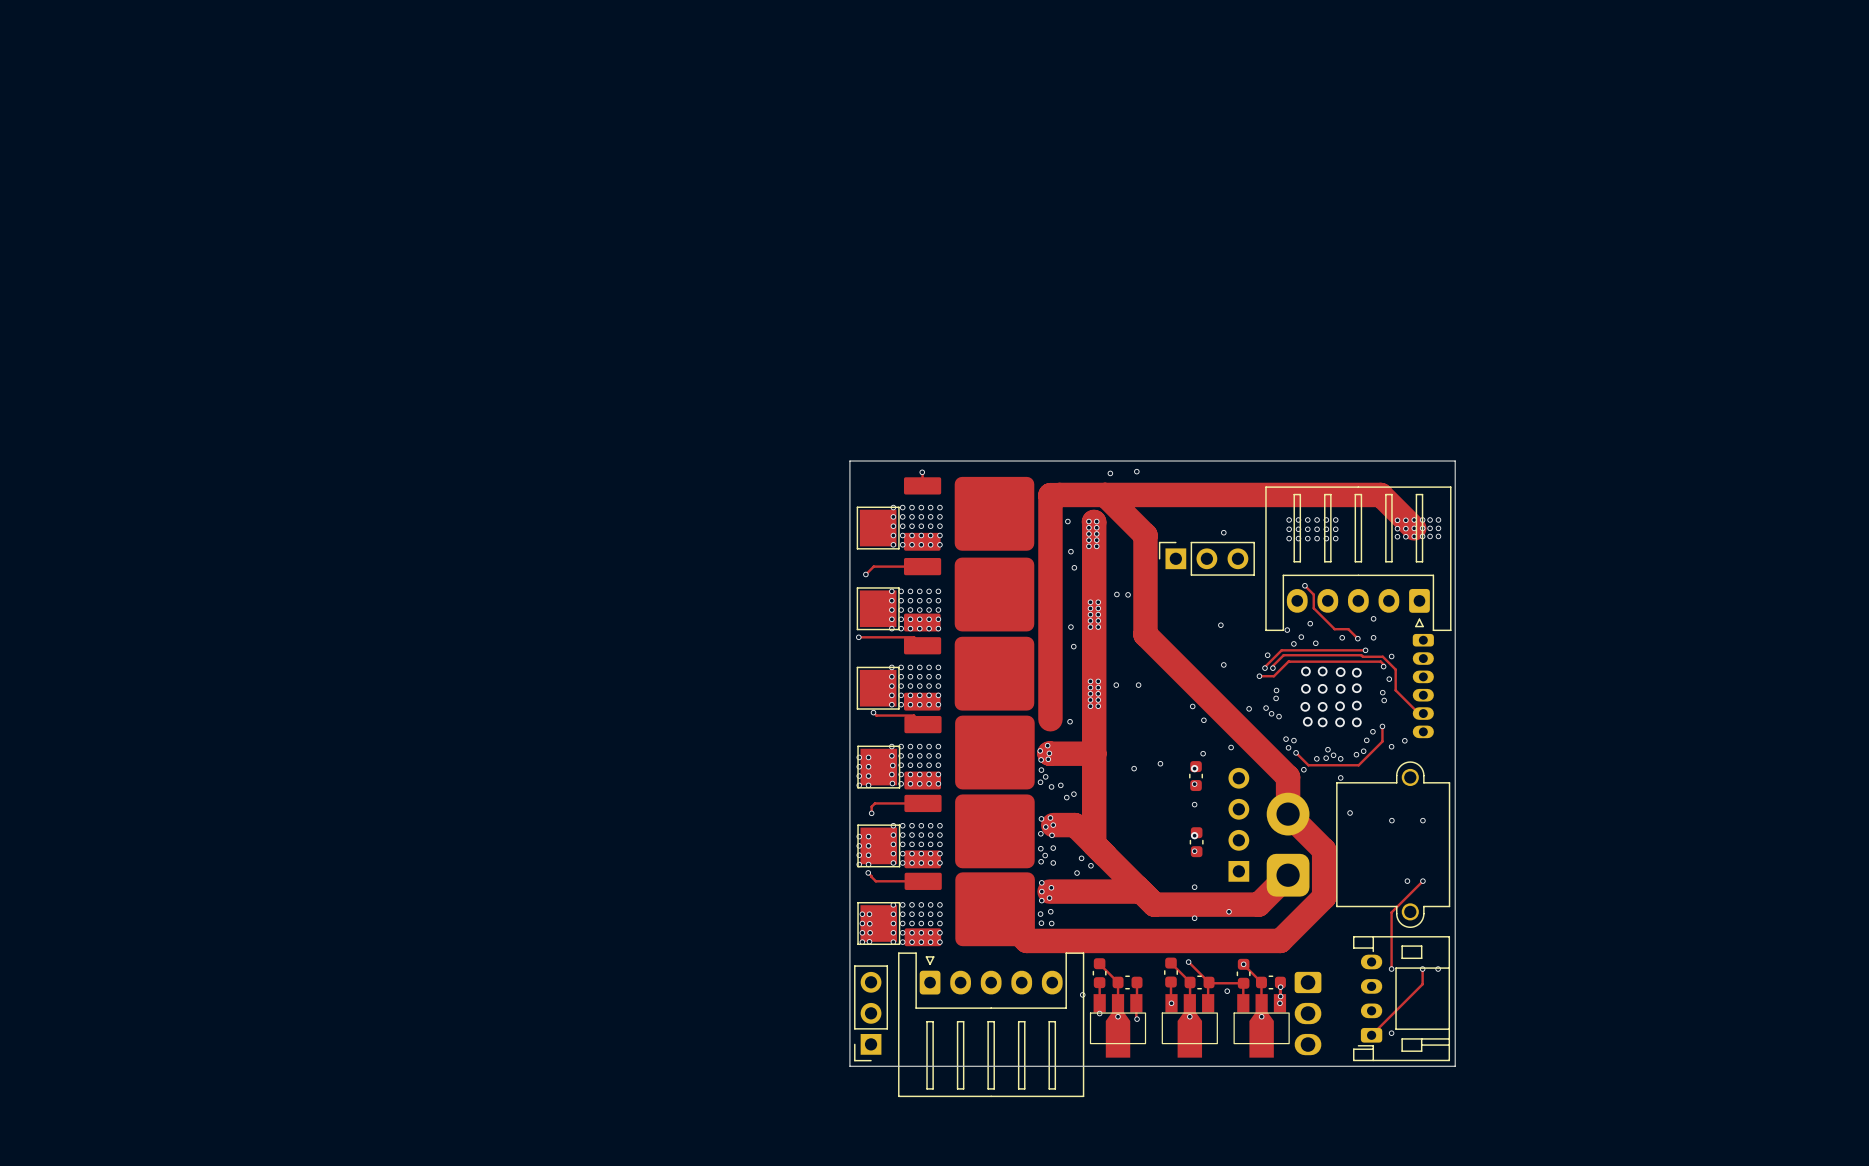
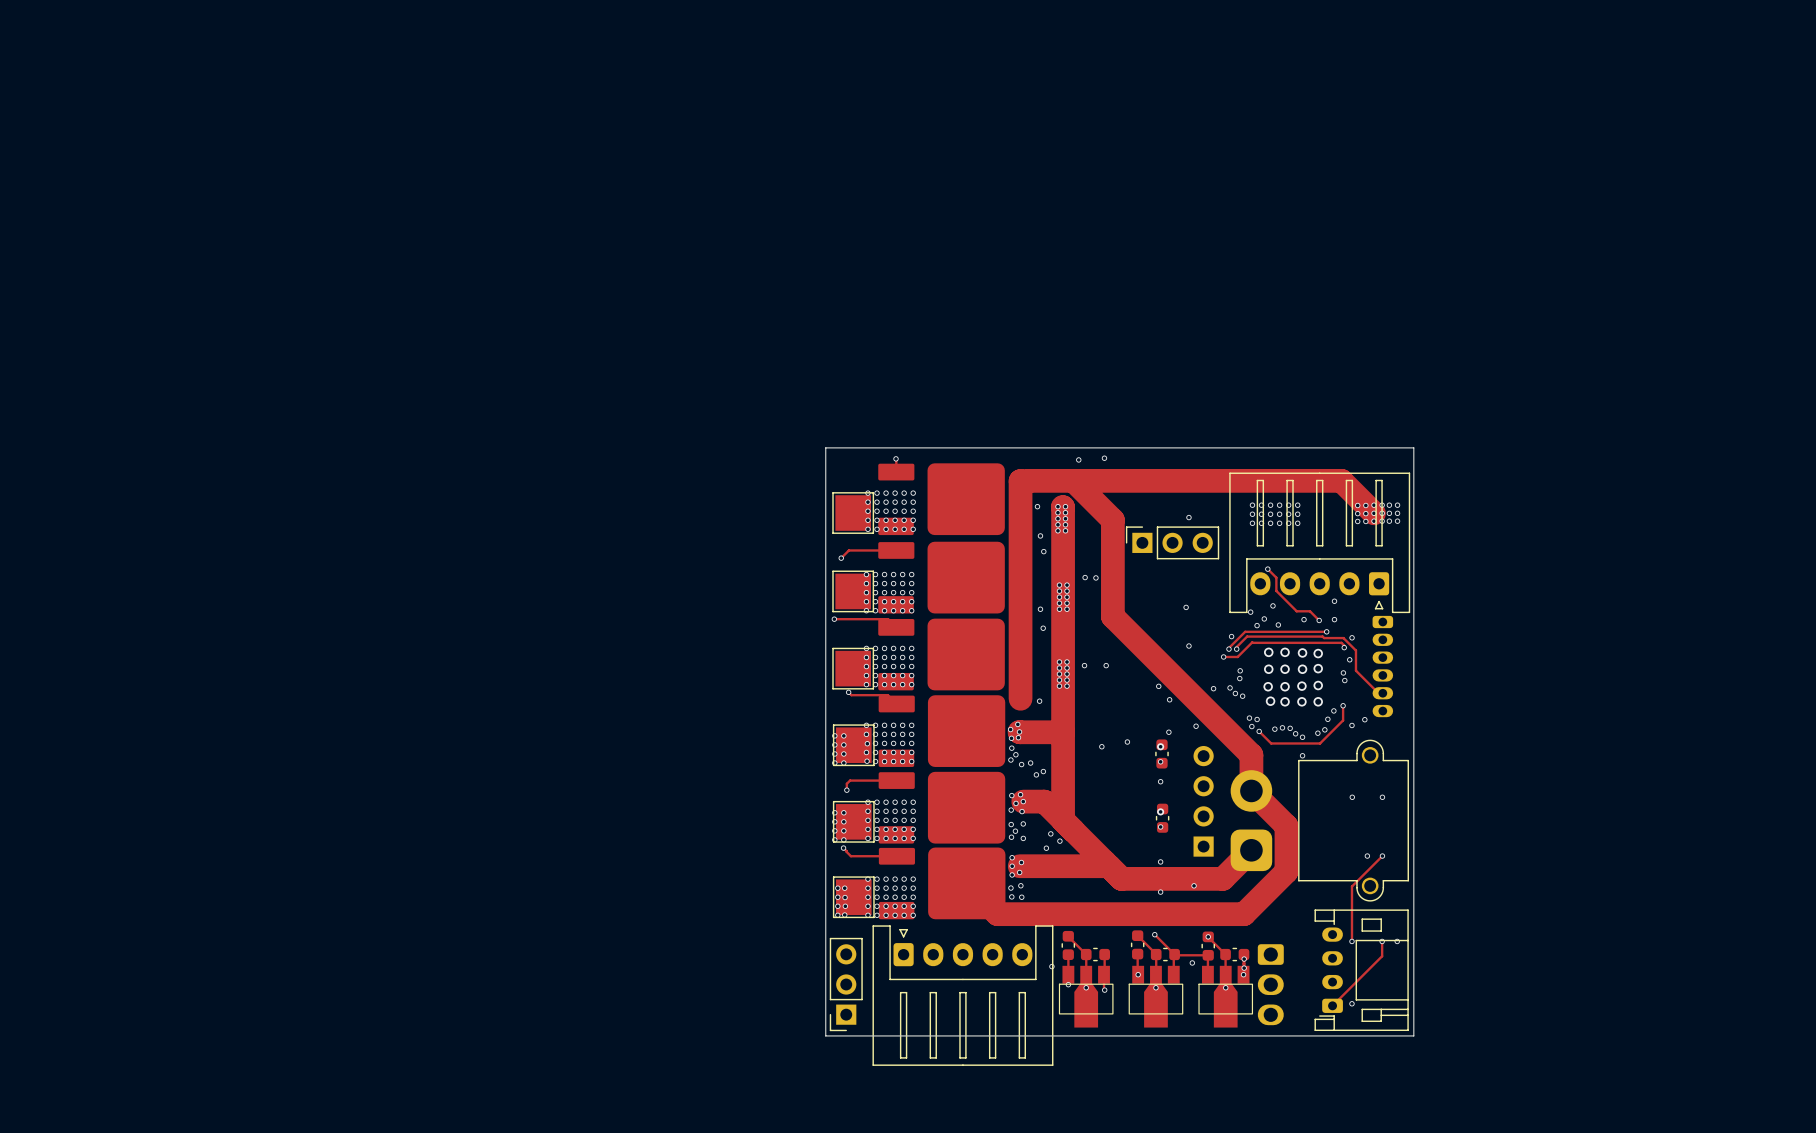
via: none -> (1282, 727)
via: none -> (1274, 729)
via: (1316, 758) -> none
via: (1326, 758) -> none
via: (1303, 769) -> none
via: (1350, 813) -> none

